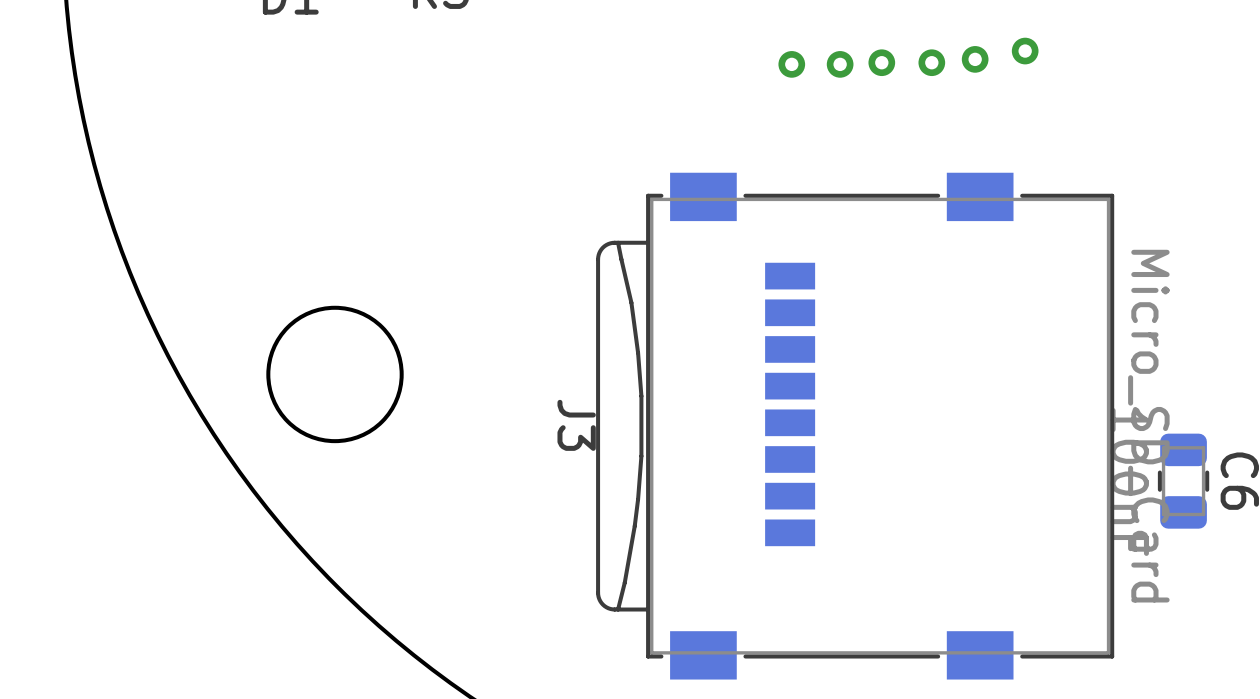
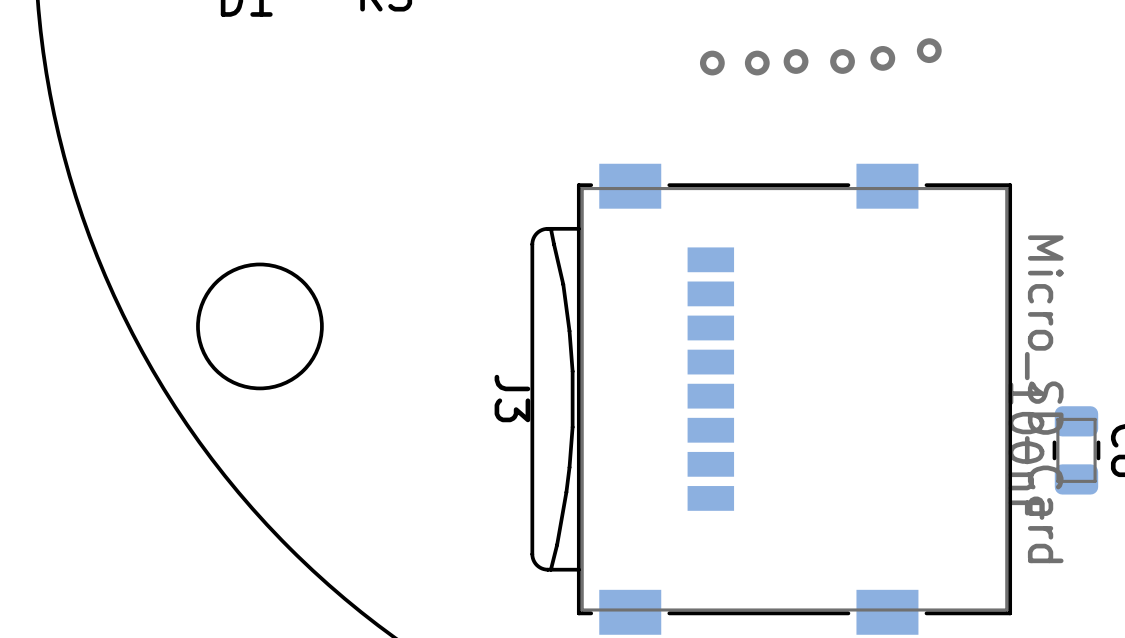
round board edge position: (335, 374) -> (259, 326)

